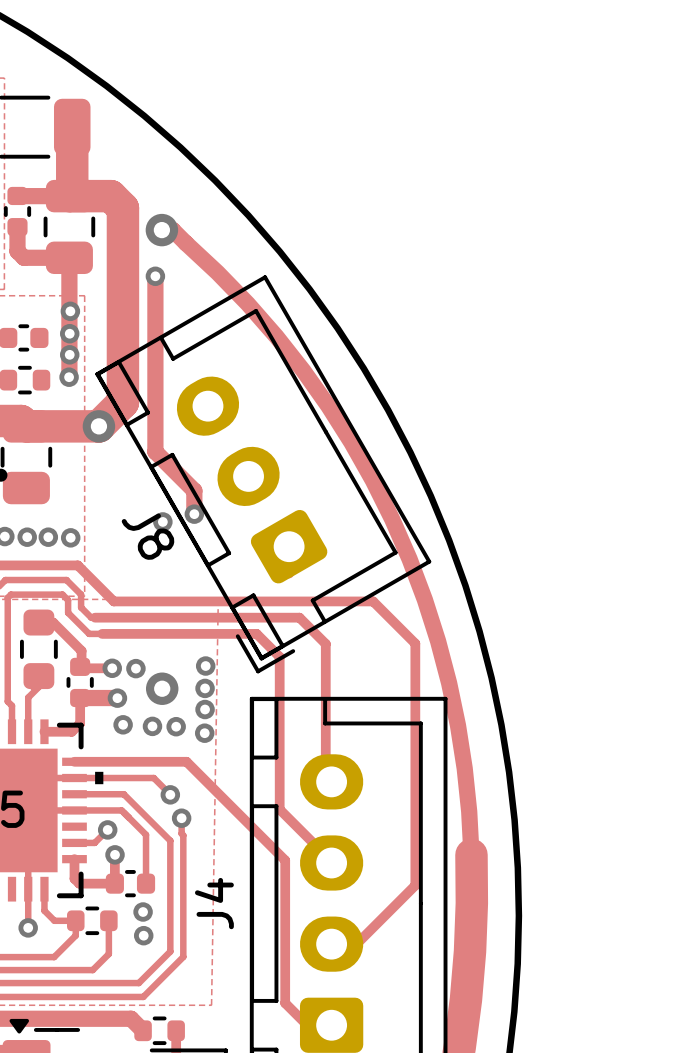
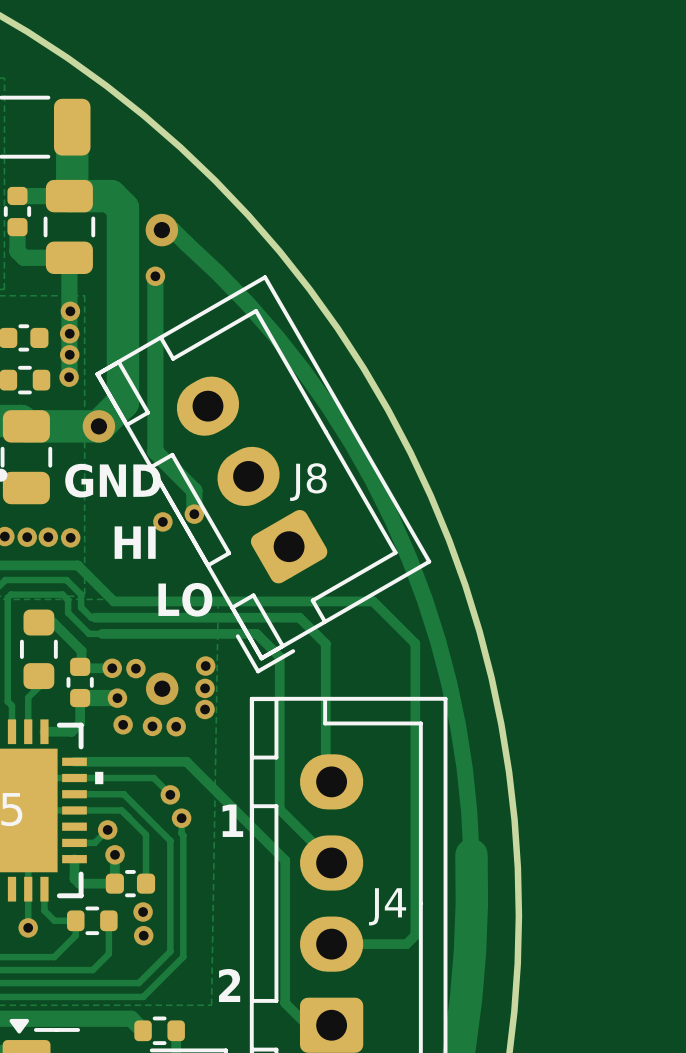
text: none -> GND (113, 480)
J8 name rotation: 0° (148, 536) -> 60° counterclockwise (308, 482)
J8 name position: J8 (148, 536) -> J8 (308, 482)
text: none -> HI (135, 542)
text: none -> LO (185, 599)
via: (204, 733) -> none
text: none -> 1 (232, 820)
track: (415, 885) (356, 944) -> (415, 885) (415, 935) (406, 944) (356, 944)
J4 name rotation: 0° (214, 903) -> 90° clockwise (387, 906)
J4 name position: J4 (214, 903) -> J4 (387, 906)
text: none -> 2 (229, 985)

